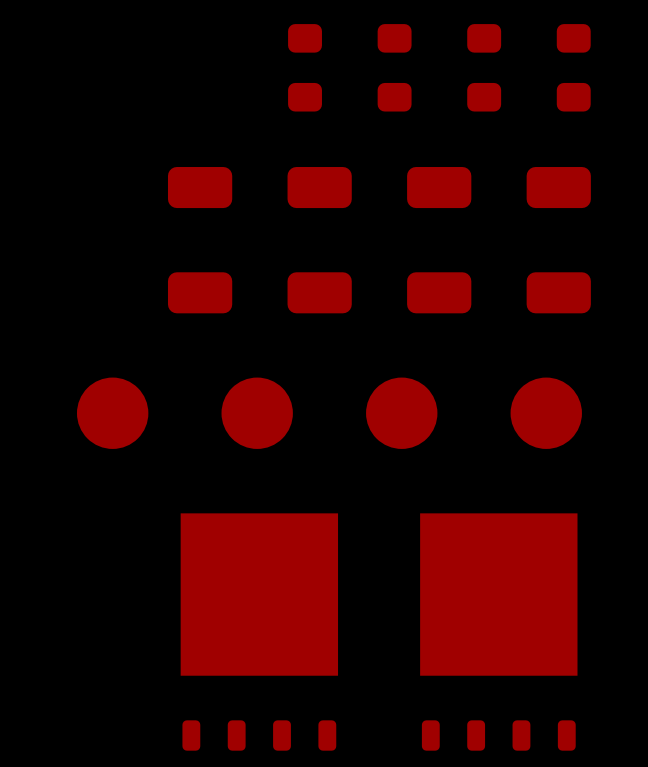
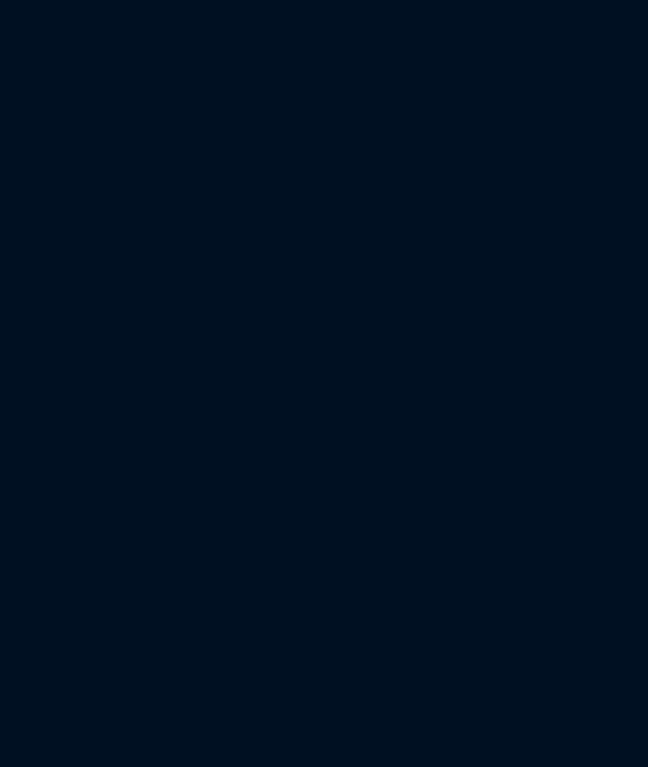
part: (305, 67) -> none
part: (394, 67) -> none
part: (484, 67) -> none
part: (573, 67) -> none
part: (200, 240) -> none
part: (319, 240) -> none
part: (439, 240) -> none
part: (558, 240) -> none
part: (112, 413) -> none
part: (257, 413) -> none
part: (401, 413) -> none
part: (546, 413) -> none
part: (259, 632) -> none
part: (498, 632) -> none

